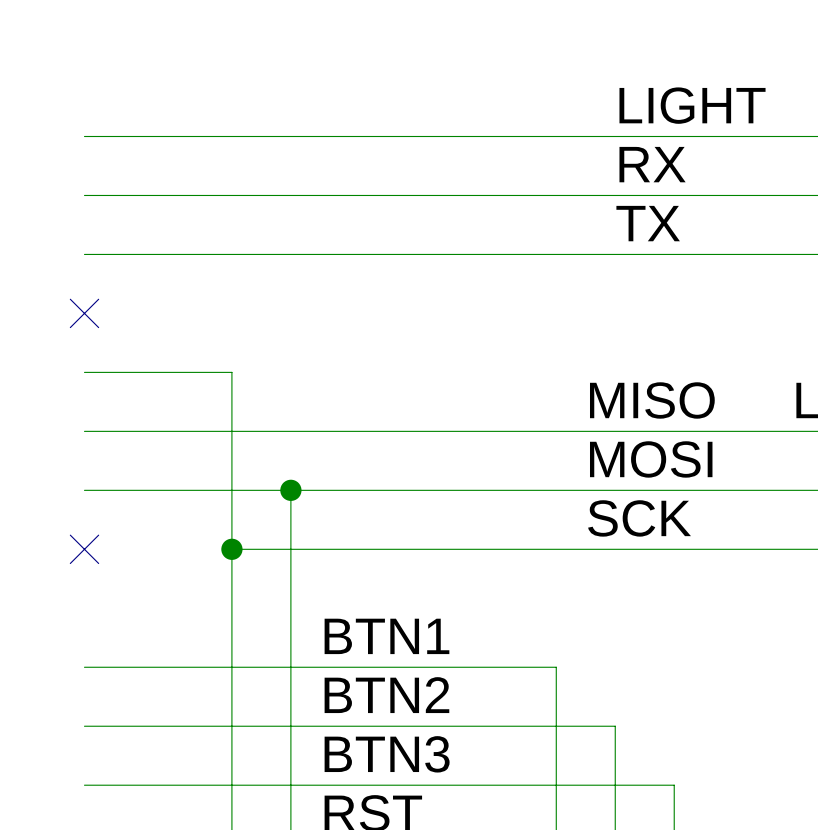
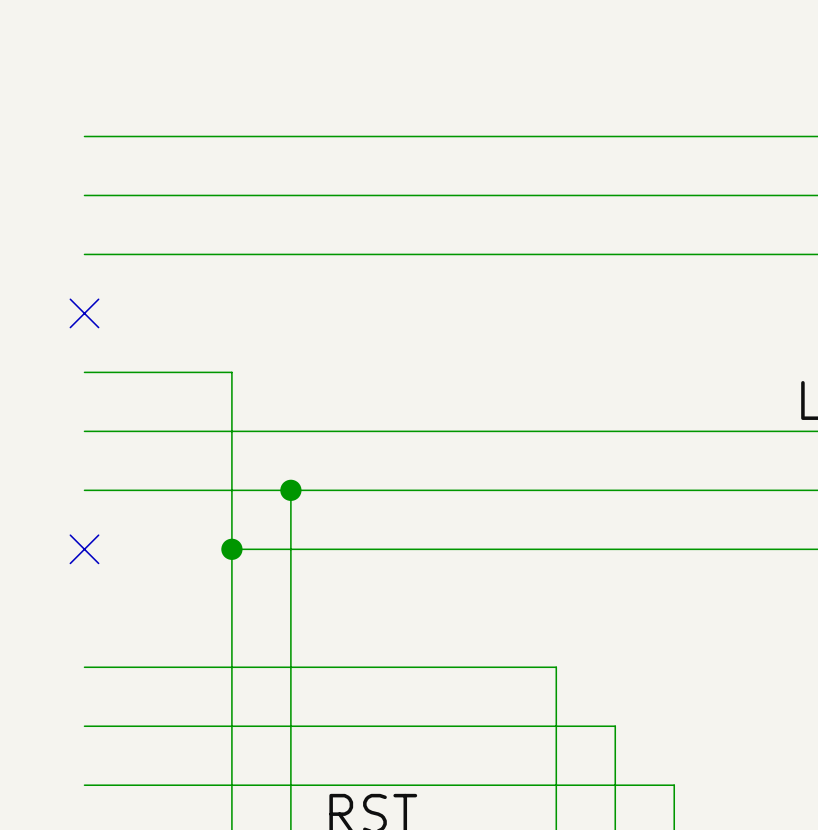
label: LIGHT (692, 105) -> none
label: RX (652, 164) -> none
label: TX (648, 223) -> none
label: MISO (652, 400) -> none
label: MOSI (651, 459) -> none
label: SCK (639, 518) -> none
label: BTN1 (386, 636) -> none
label: BTN2 (386, 695) -> none
label: BTN3 (387, 754) -> none

